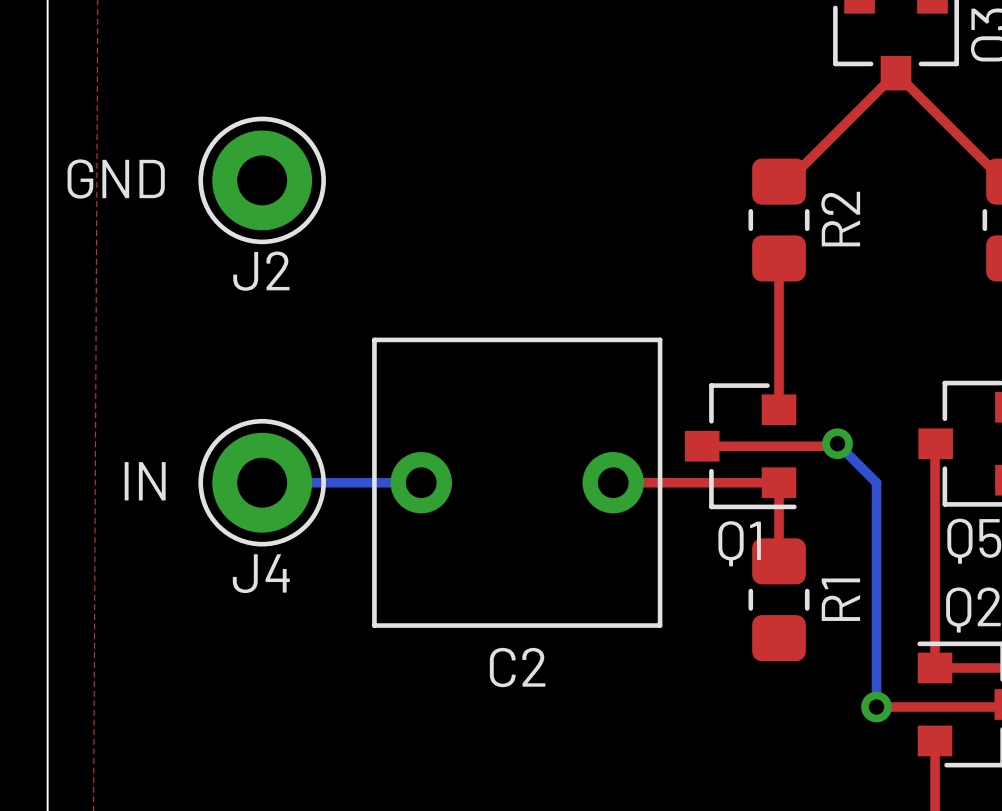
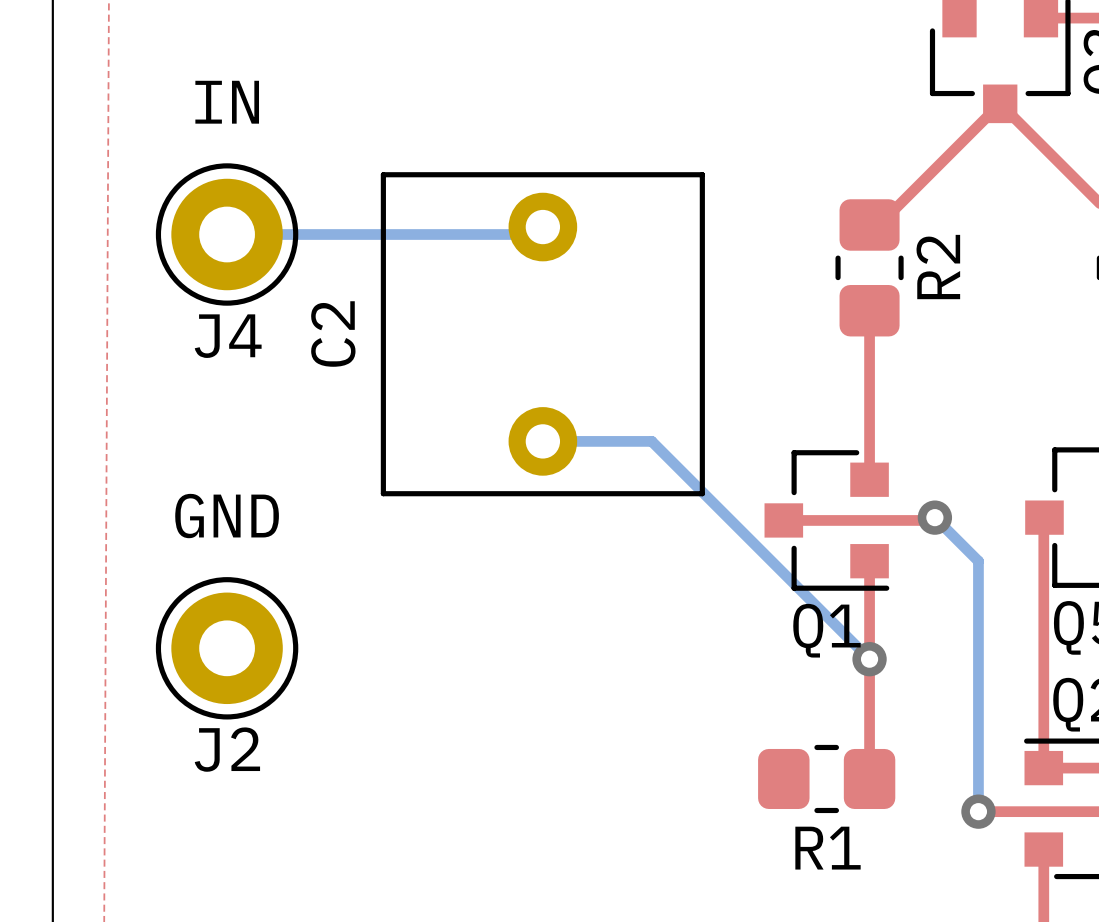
text position: GND (116, 178) -> GND (227, 516)
J2 position: (262, 180) -> (227, 648)
bottom track: none -> (542, 227) (535, 234) (227, 234)
bottom track: none -> (542, 441) (651, 441) (869, 659)
text position: IN (145, 481) -> IN (227, 102)
bottom track: (262, 482) (421, 482) -> none
J4 position: (262, 482) -> (227, 234)
C2 rotation: 0° (517, 482) -> 90° clockwise (542, 334)
C2 position: (517, 482) -> (542, 334)
top track: (613, 482) (779, 482) -> none
top track: none -> (869, 648) (869, 778)
via: none -> (869, 659)
R1 rotation: 0° (779, 599) -> 90° clockwise (826, 778)
R1 position: (779, 599) -> (826, 778)

